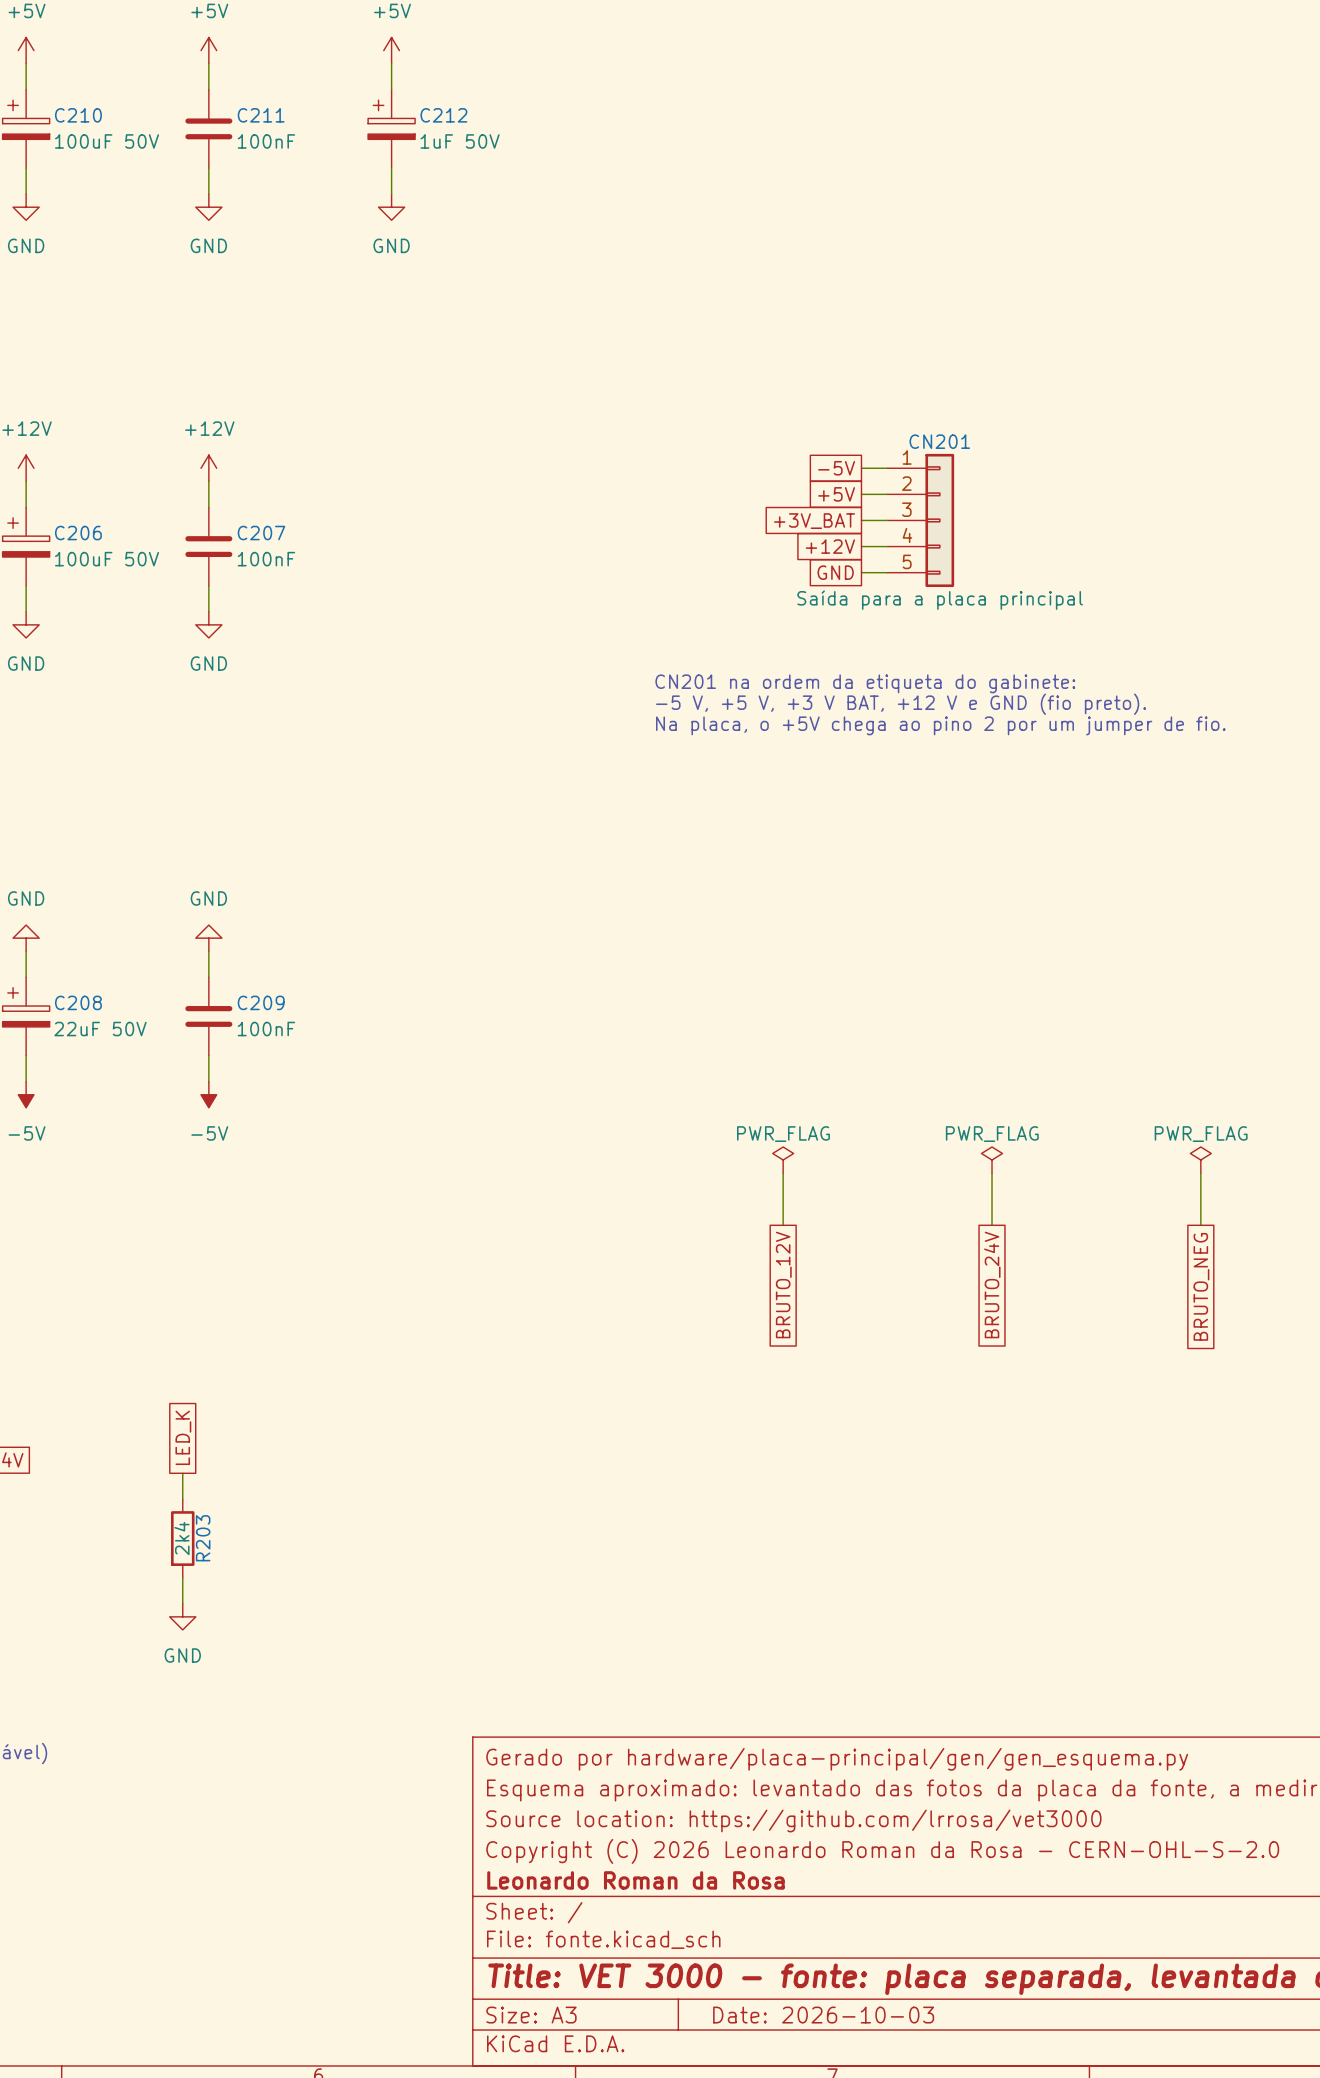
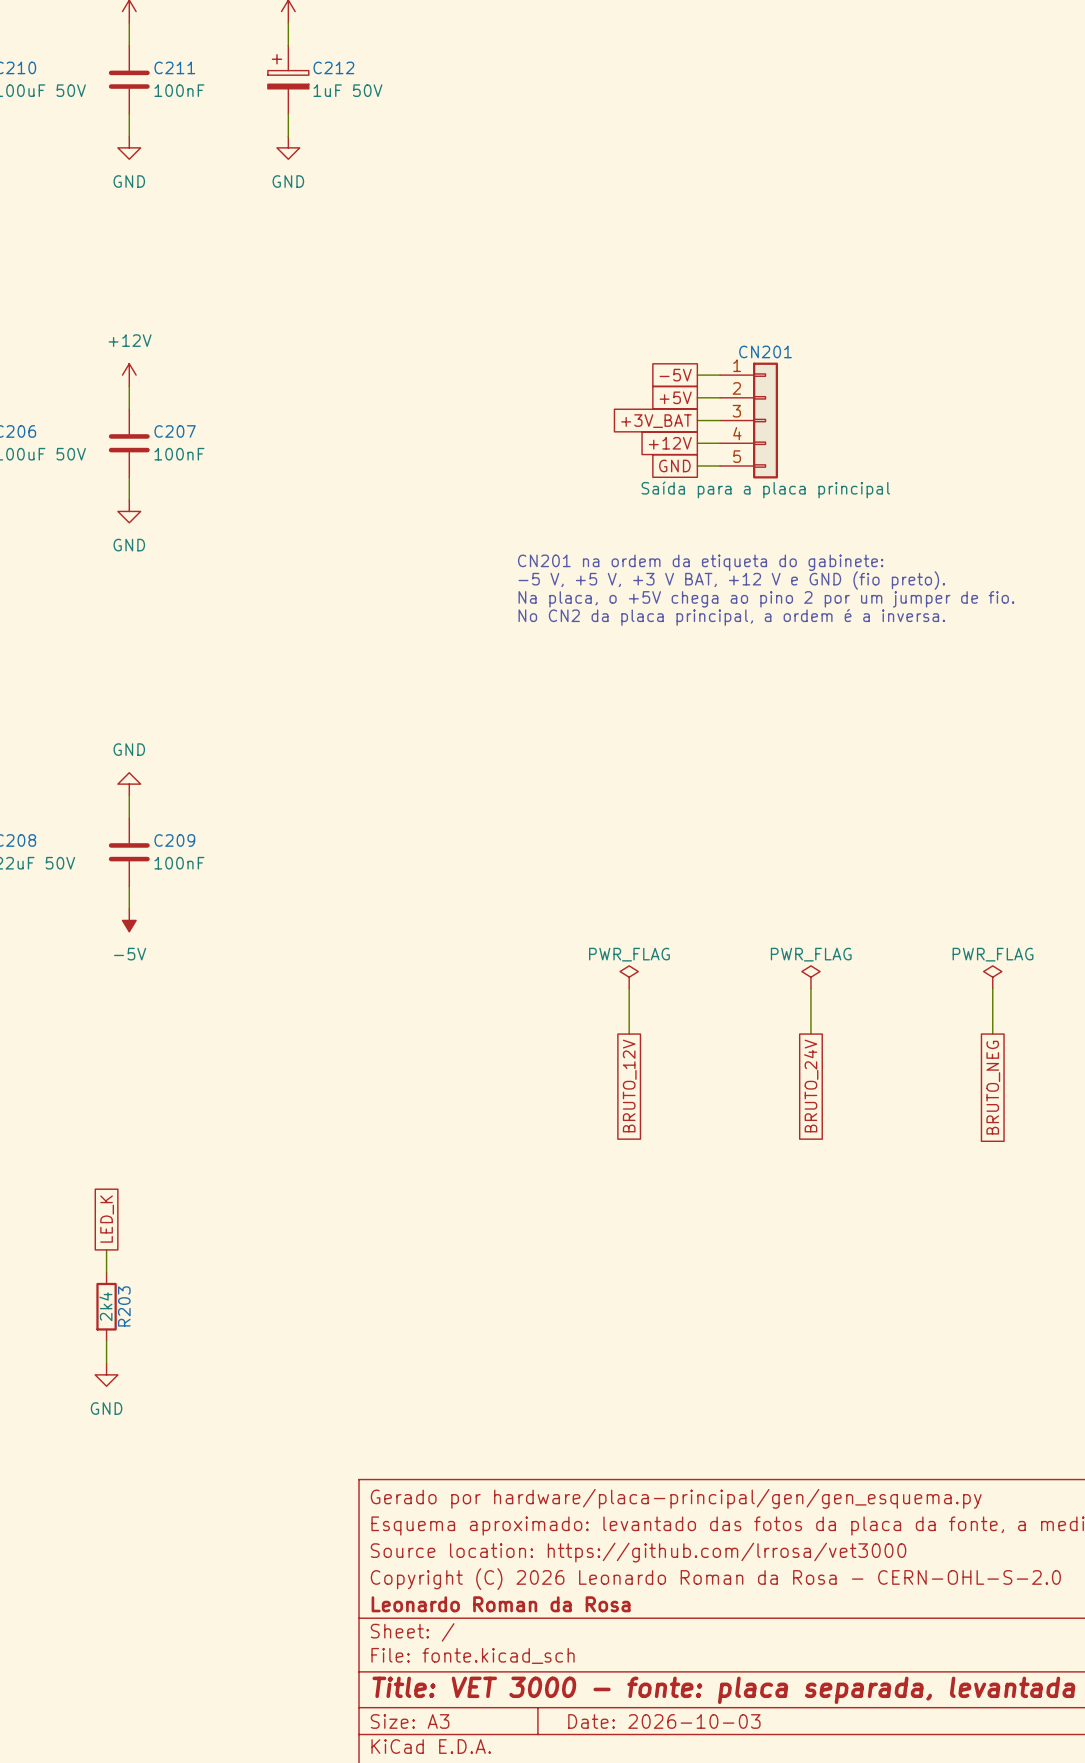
text: none -> No CN2 da placa principal, a ordem é a inversa. (731, 617)

